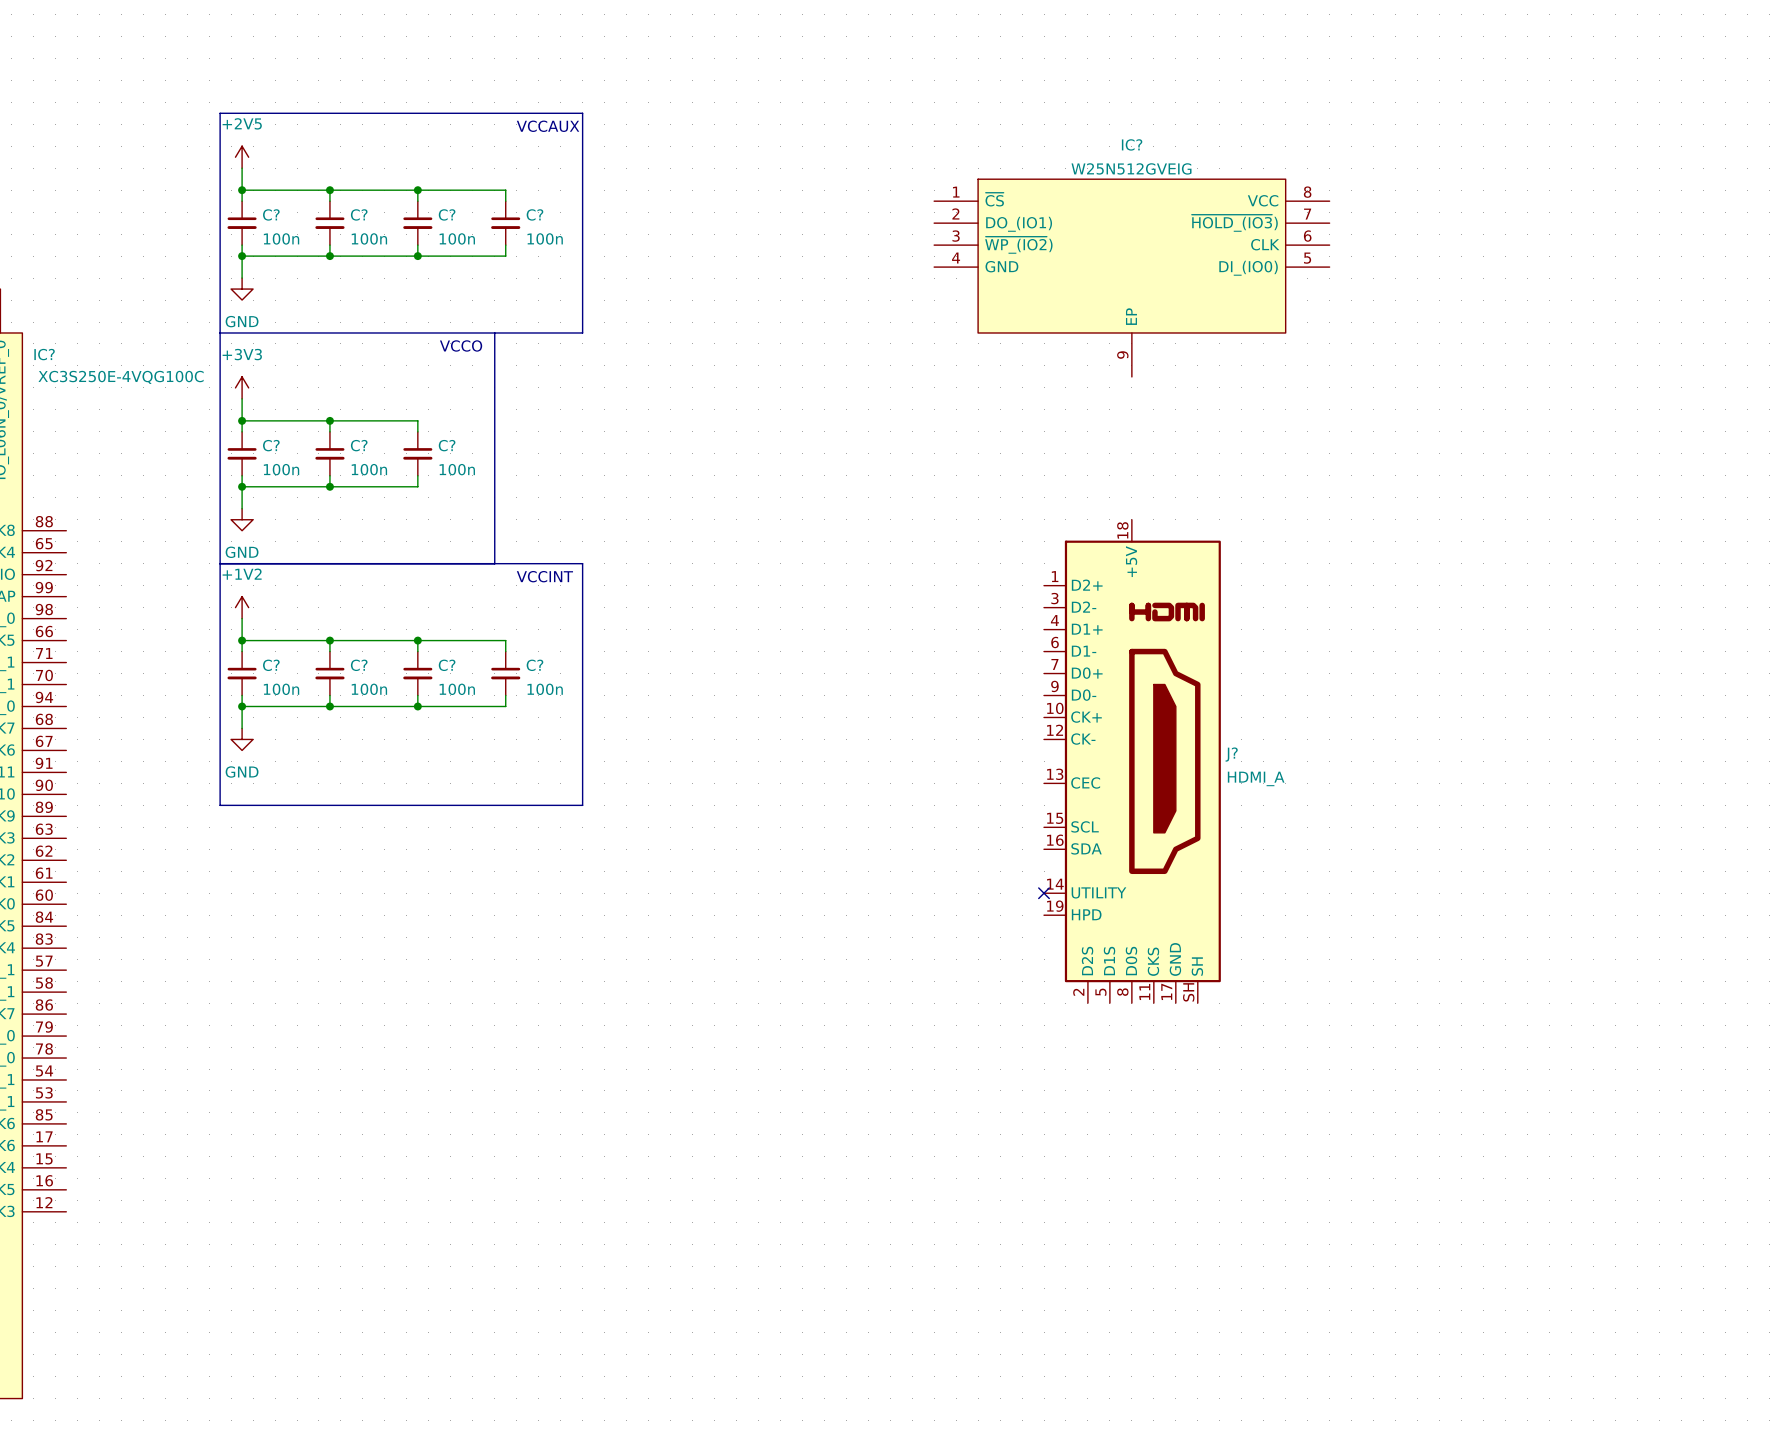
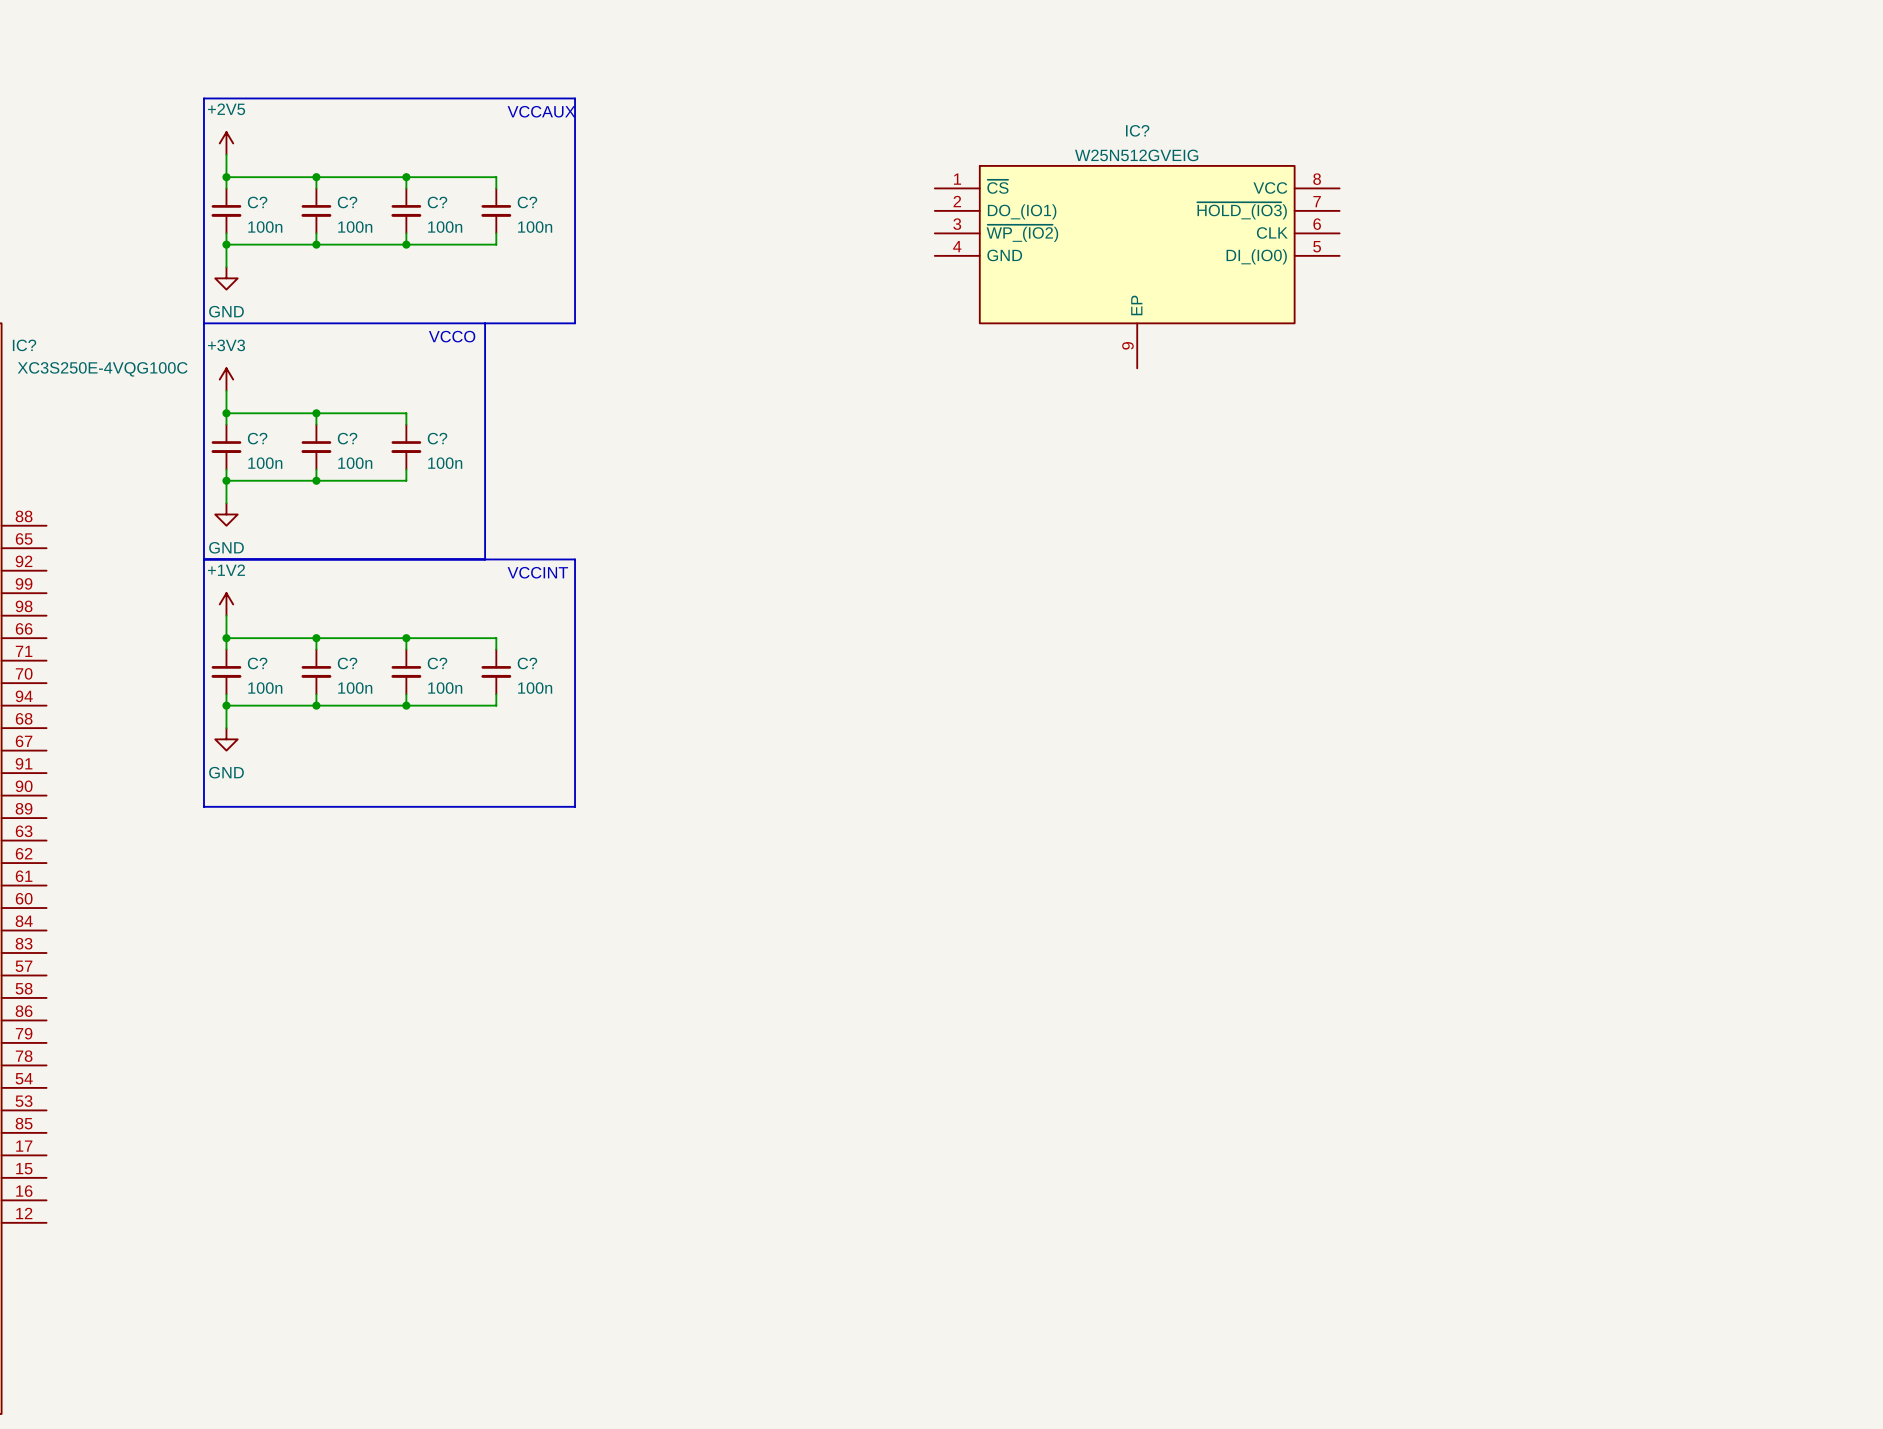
J?: HDMI_A (1132, 761) -> none
no-connect mark: (1044, 893) -> none

